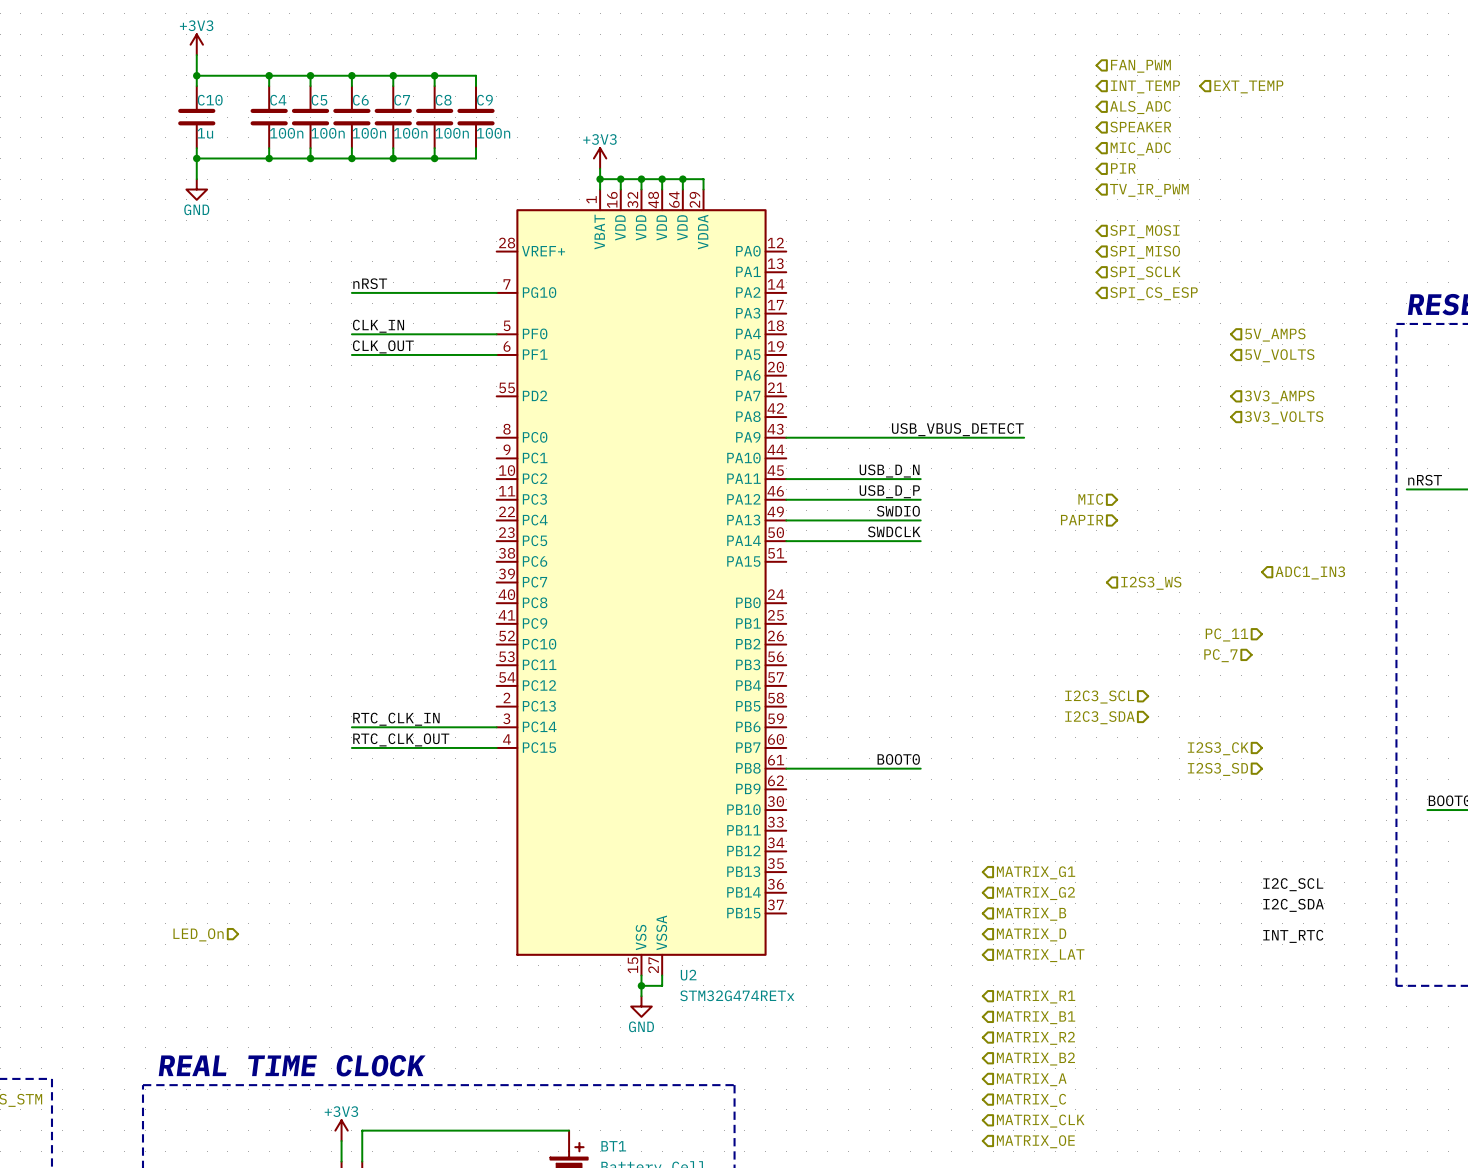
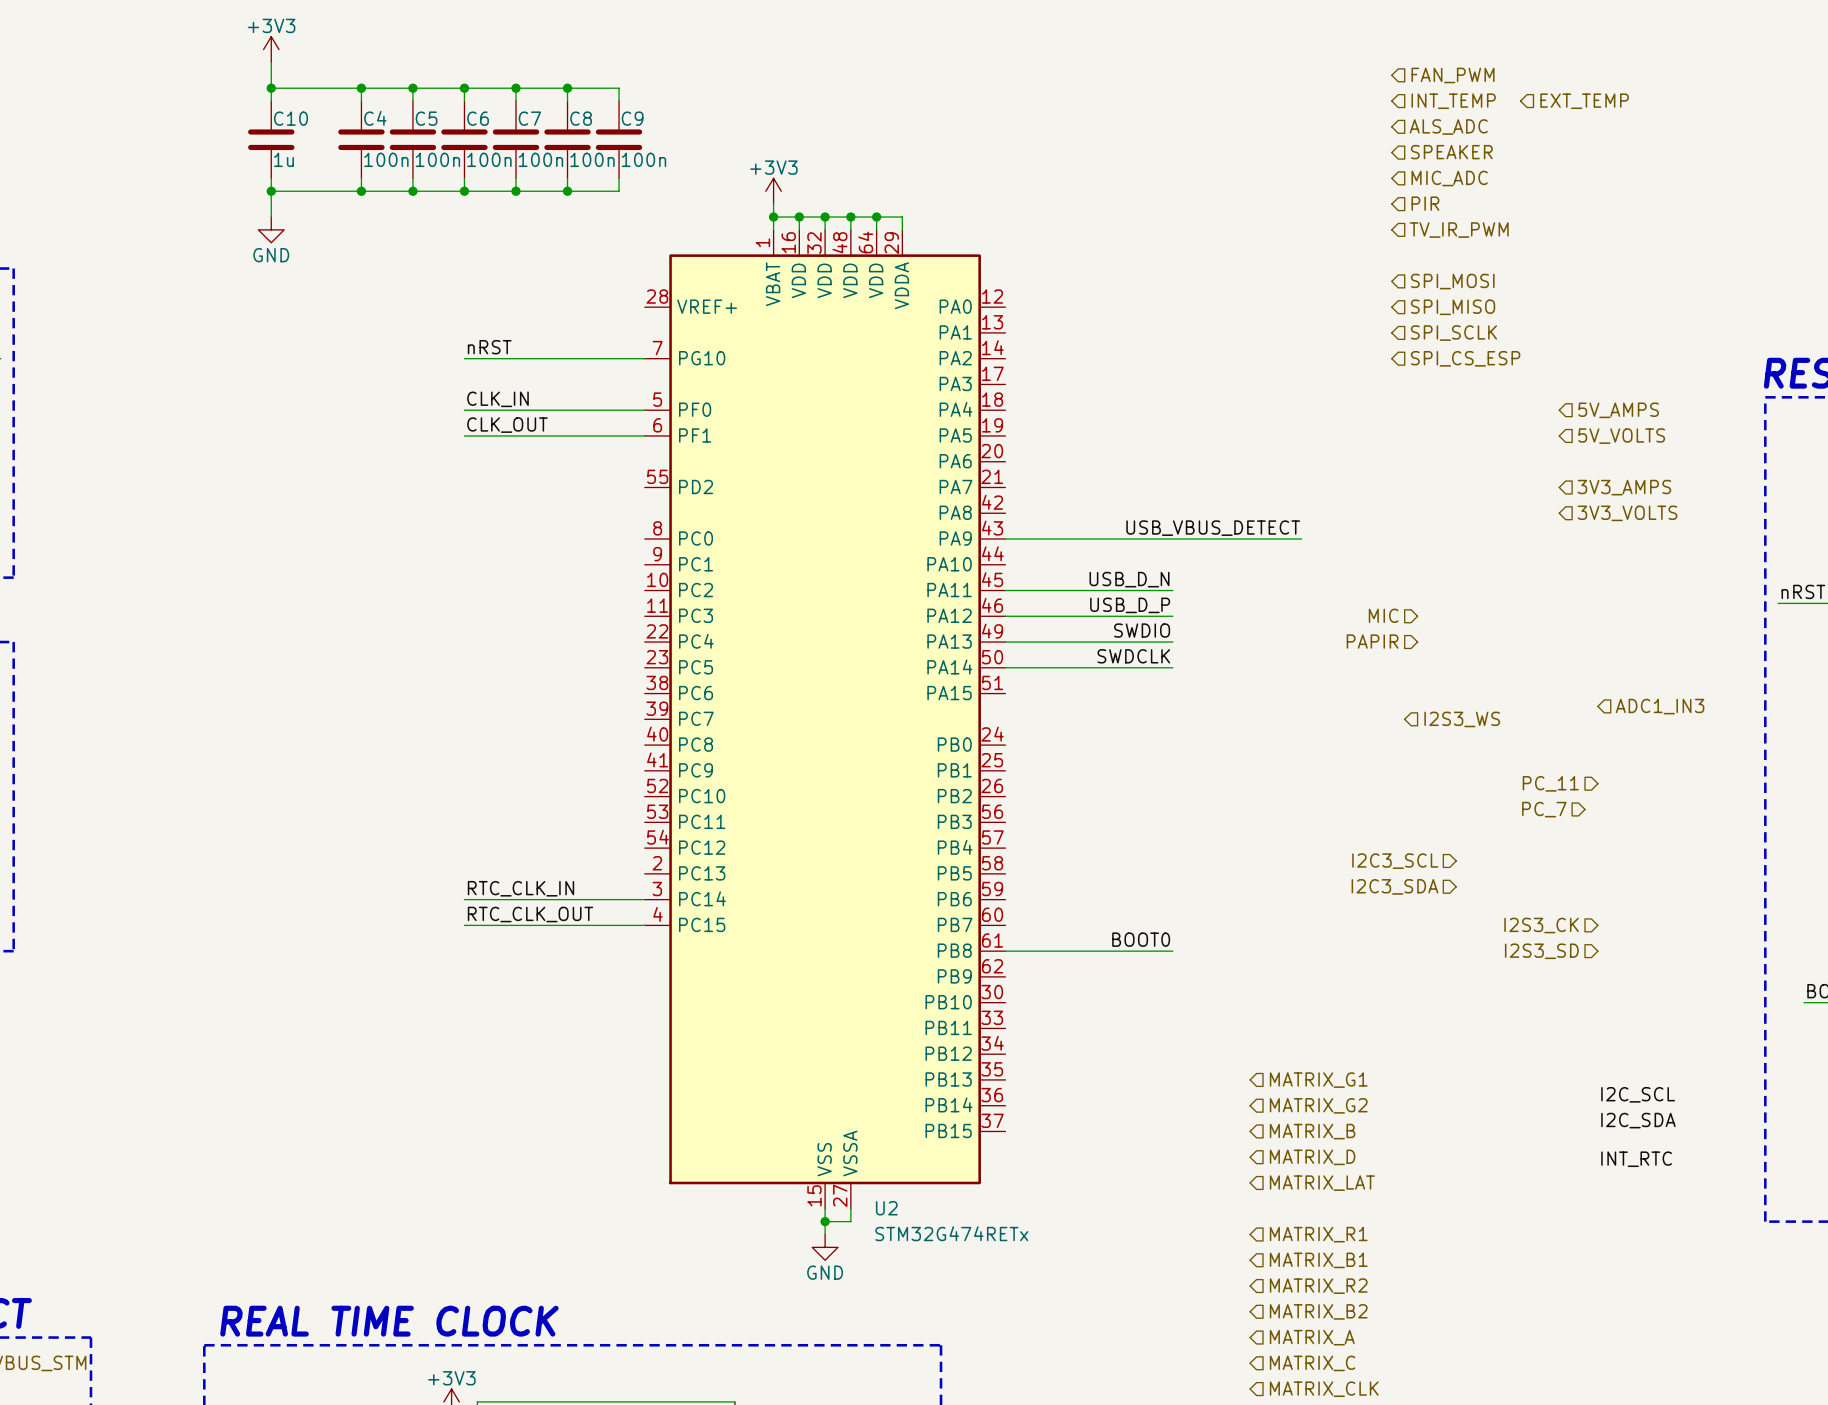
hierarchical label: LED_On (198, 934) -> none

